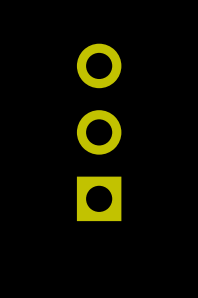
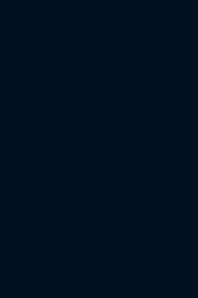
part: (99, 132) -> none

